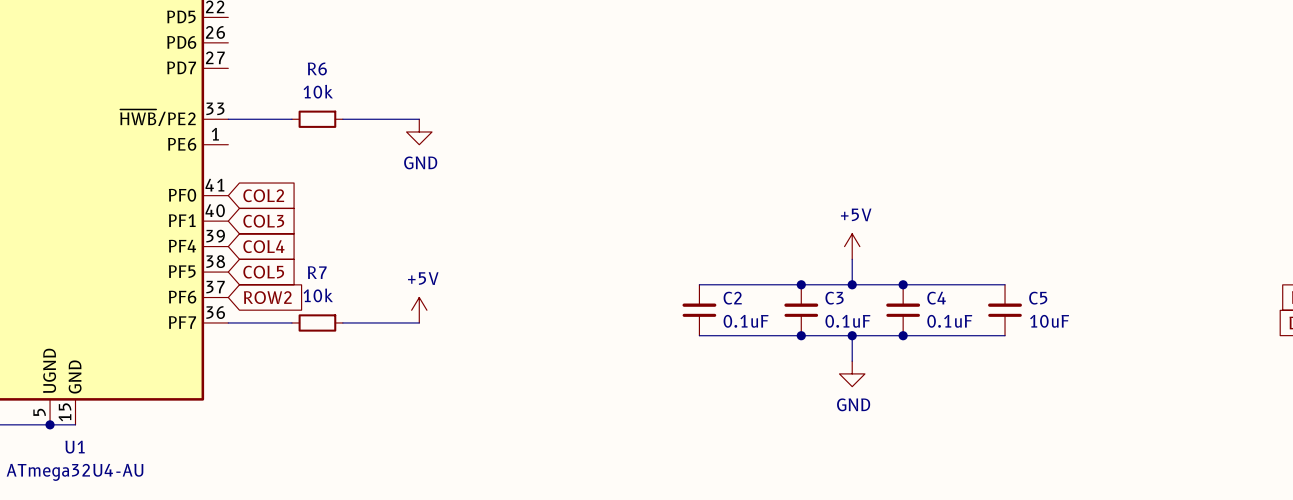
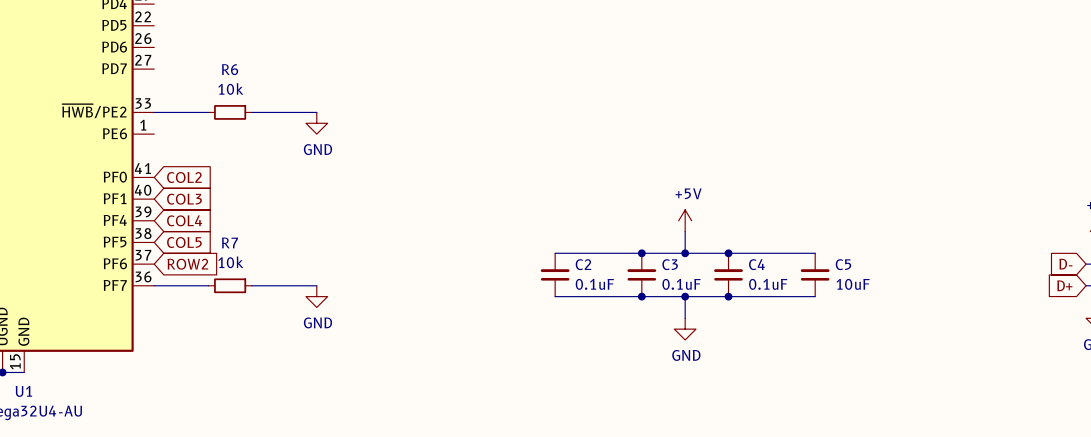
power symbol: +5V (419, 310) -> none
power symbol: none -> GND (316, 296)

